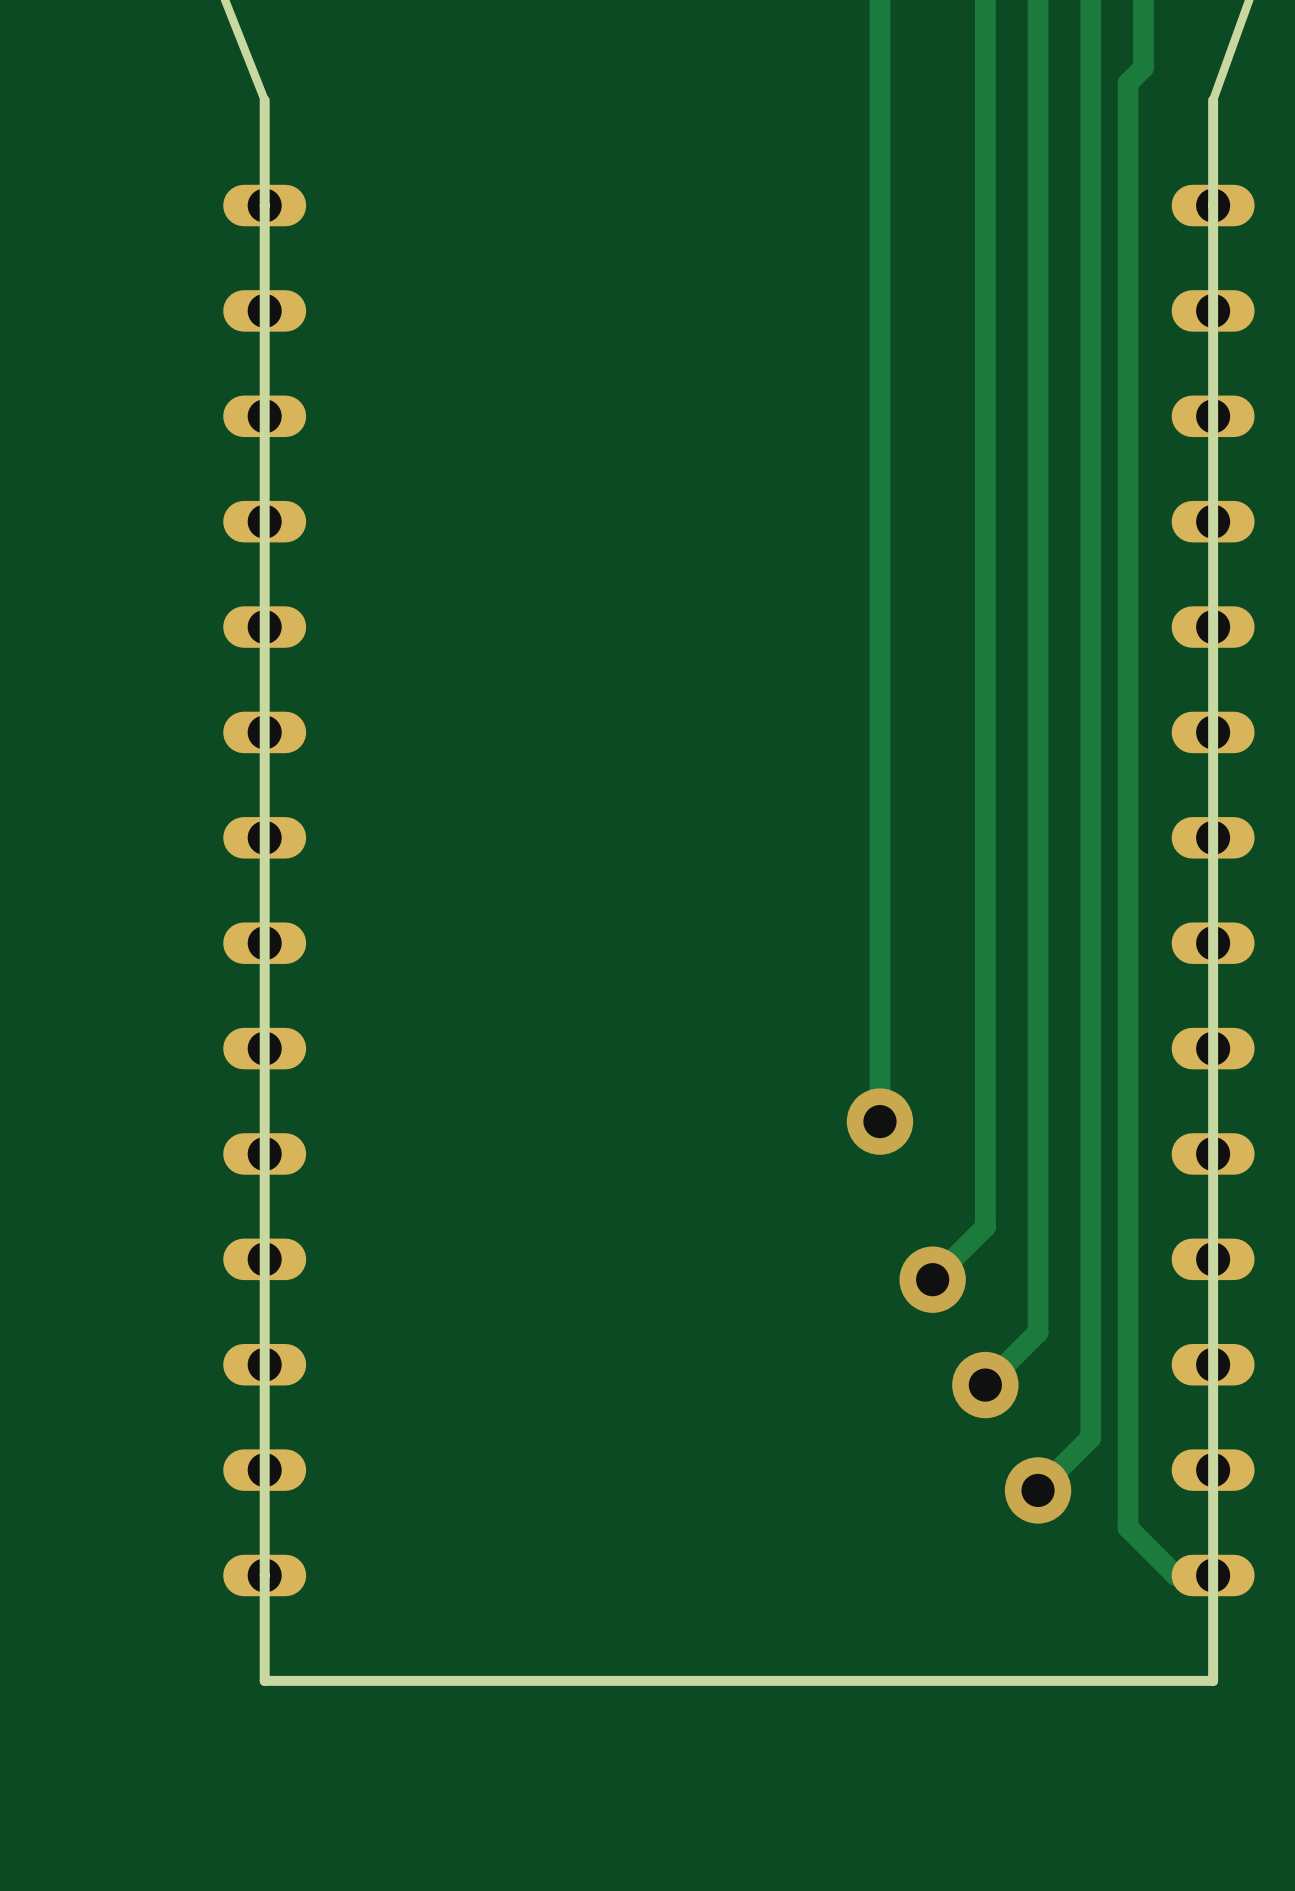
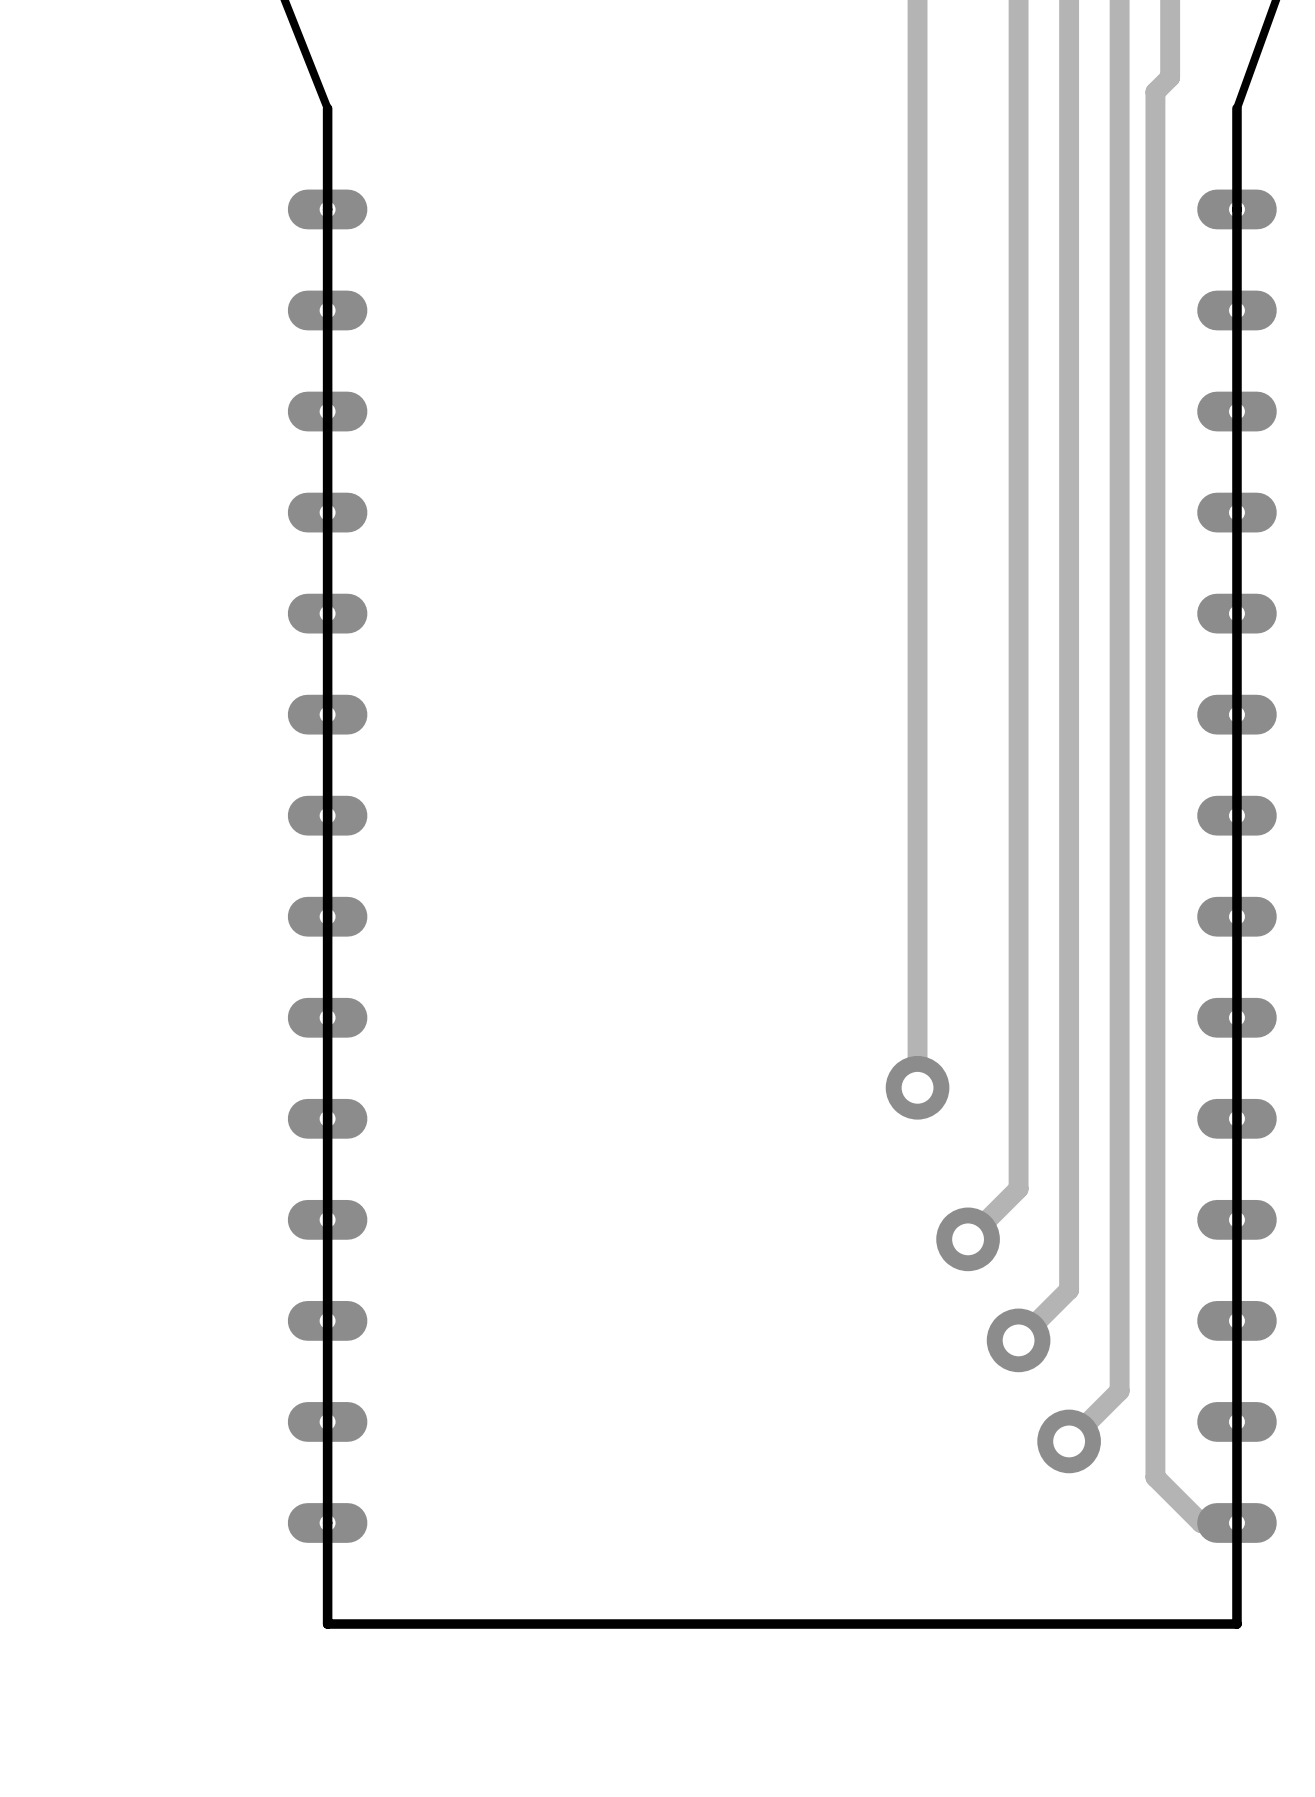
part footprint: [223, 95, 1255, 1686] -> [287, 103, 1277, 1629]

